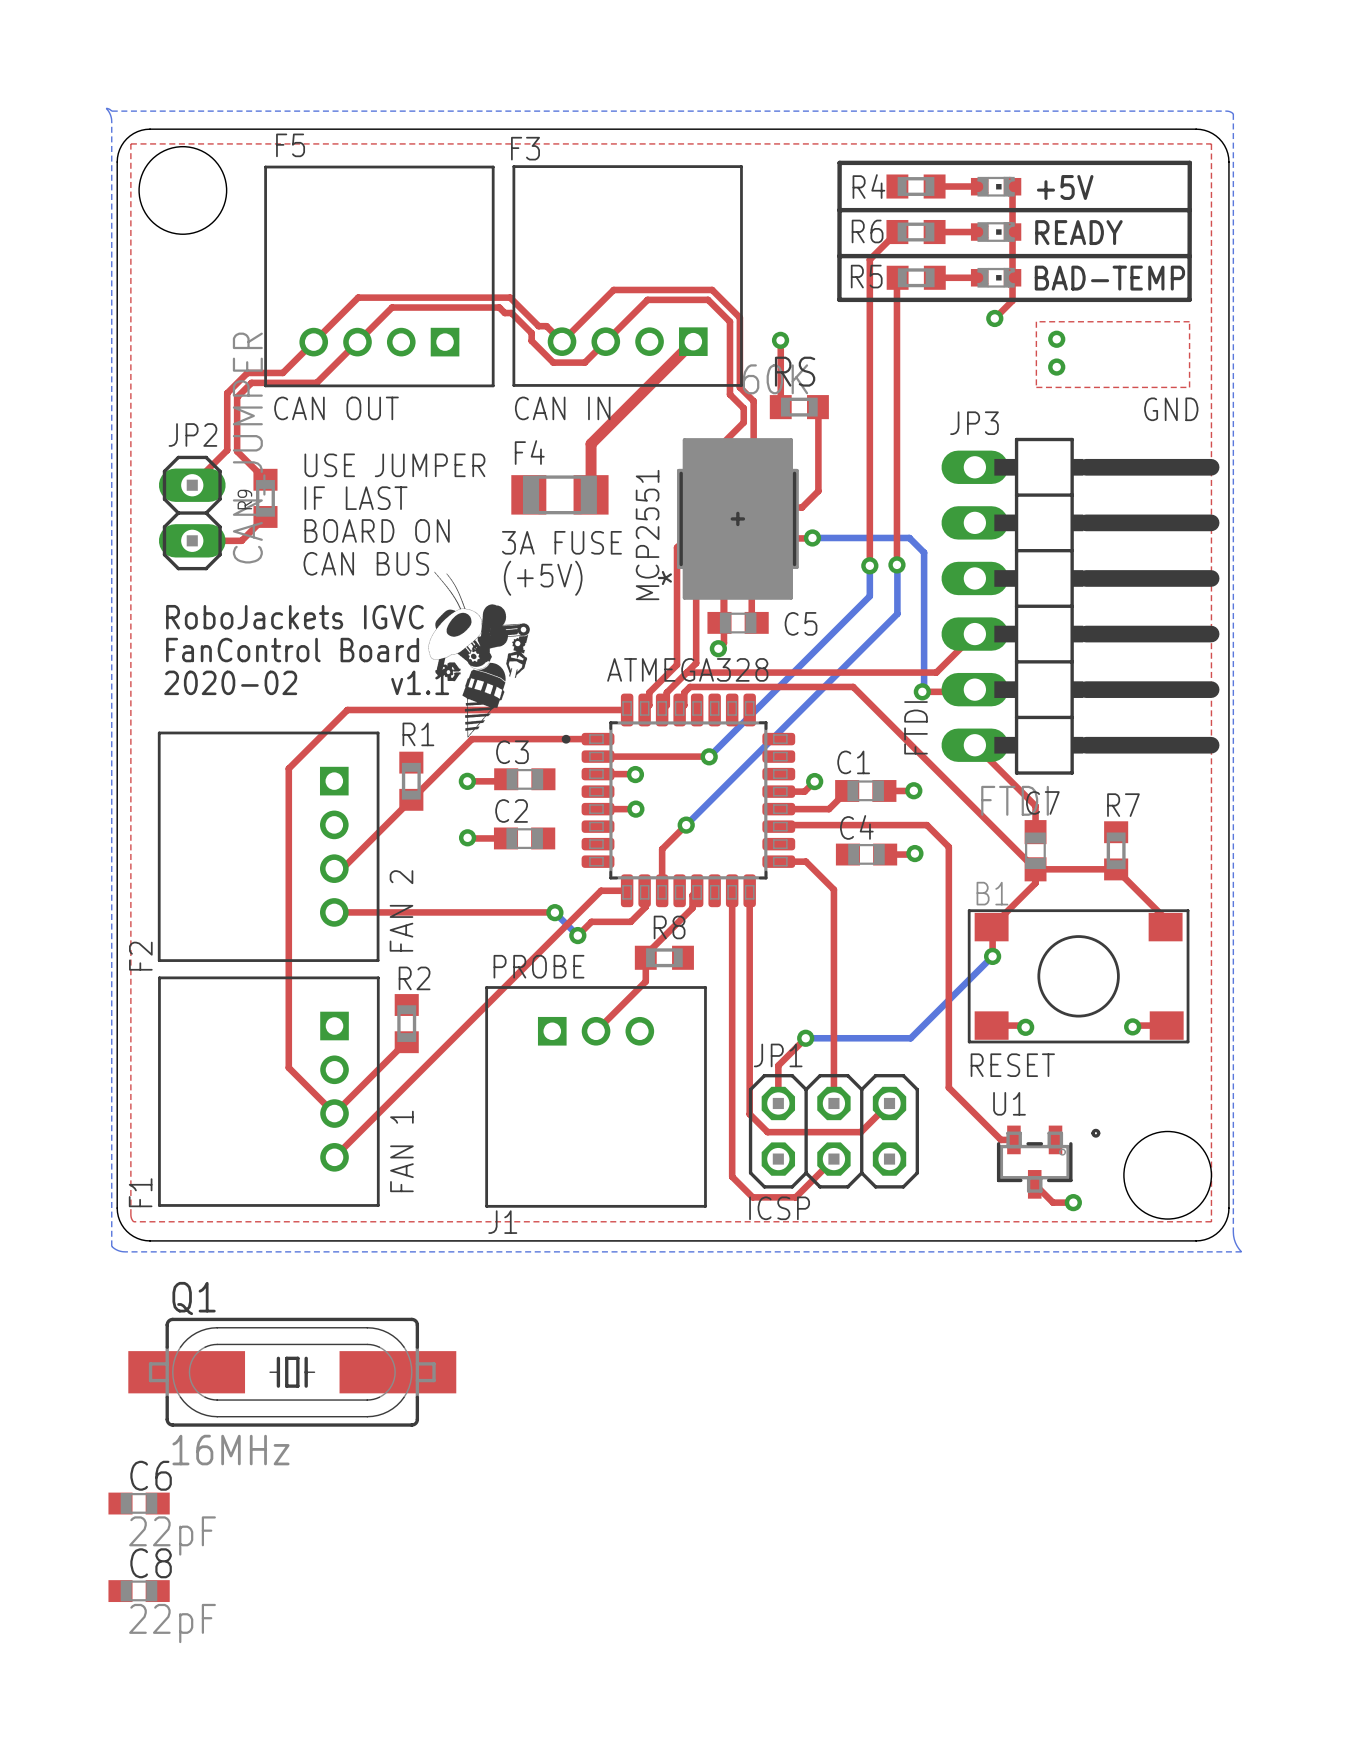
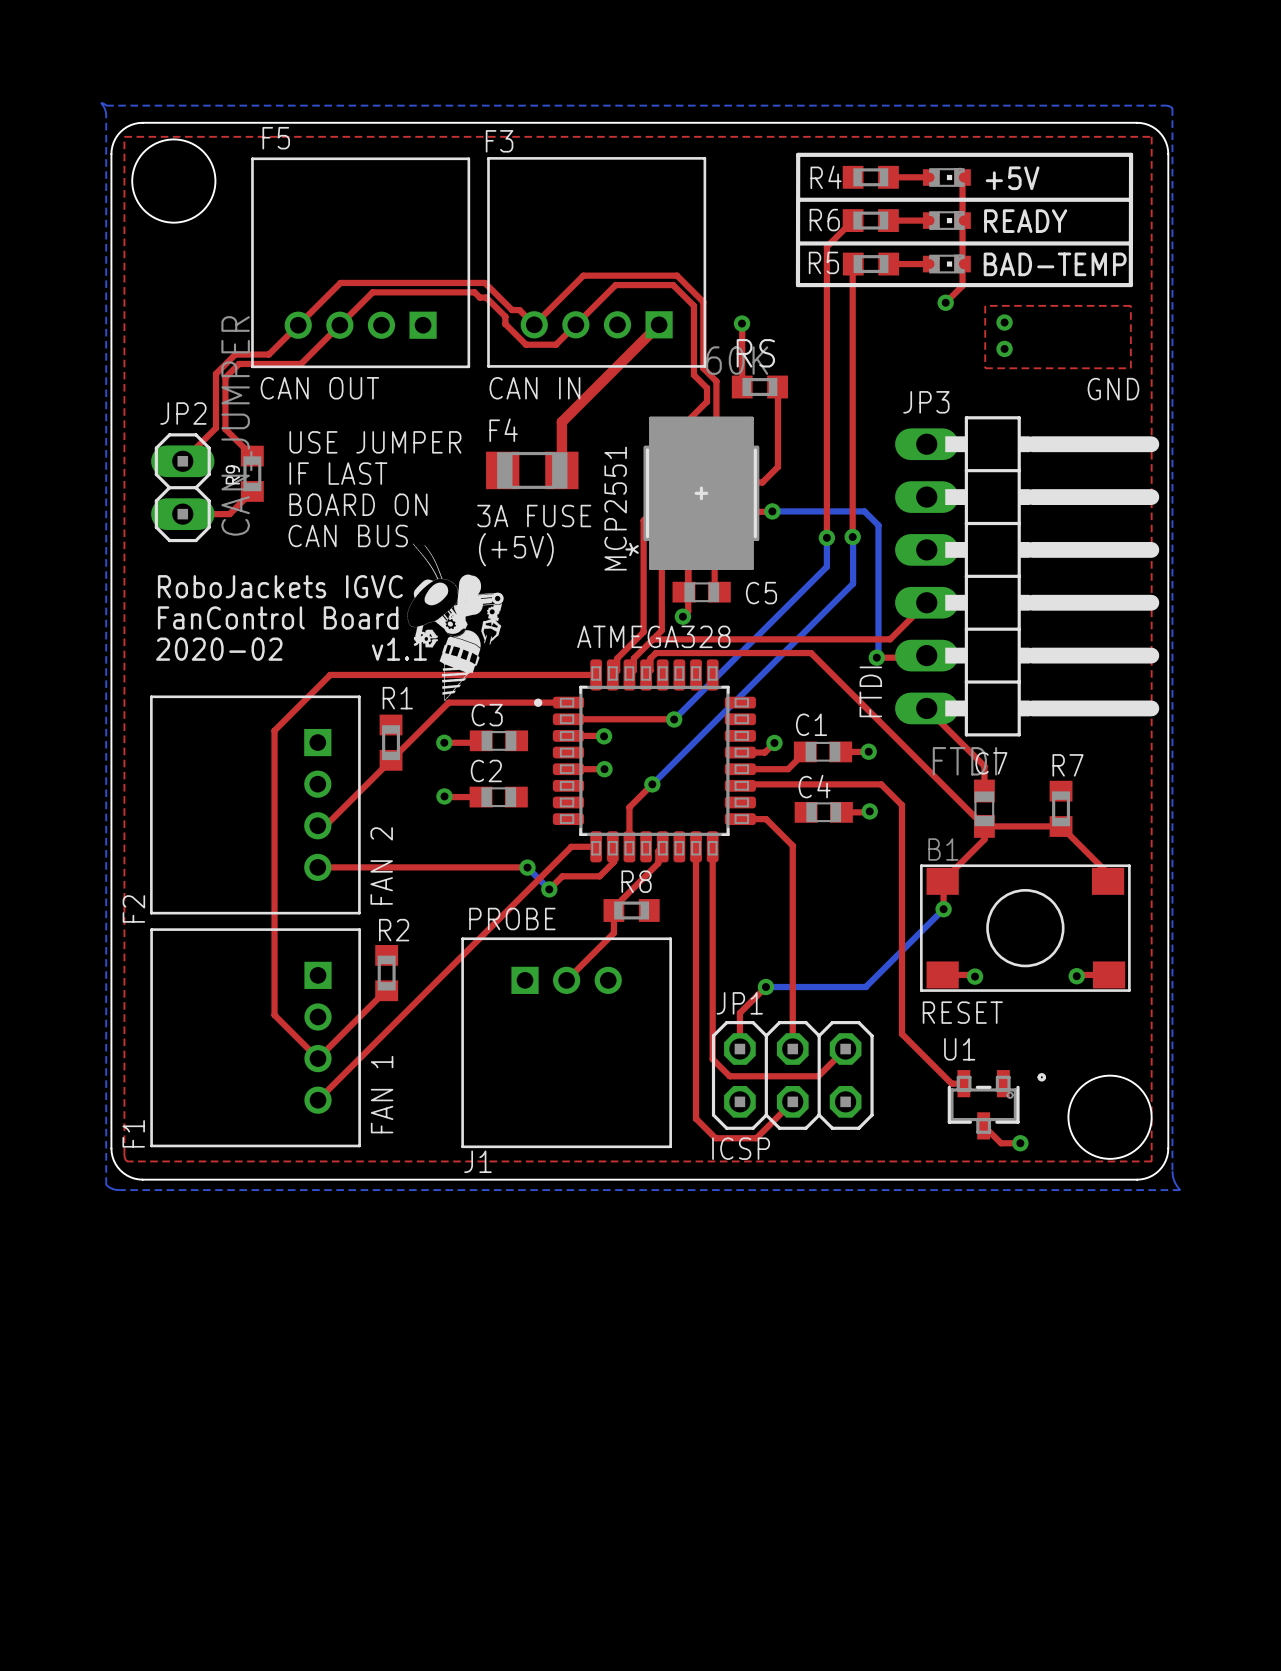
Q1: 16MHz (292, 1372) -> none
C6: 22pF (139, 1503) -> none
C8: 22pF (139, 1591) -> none

